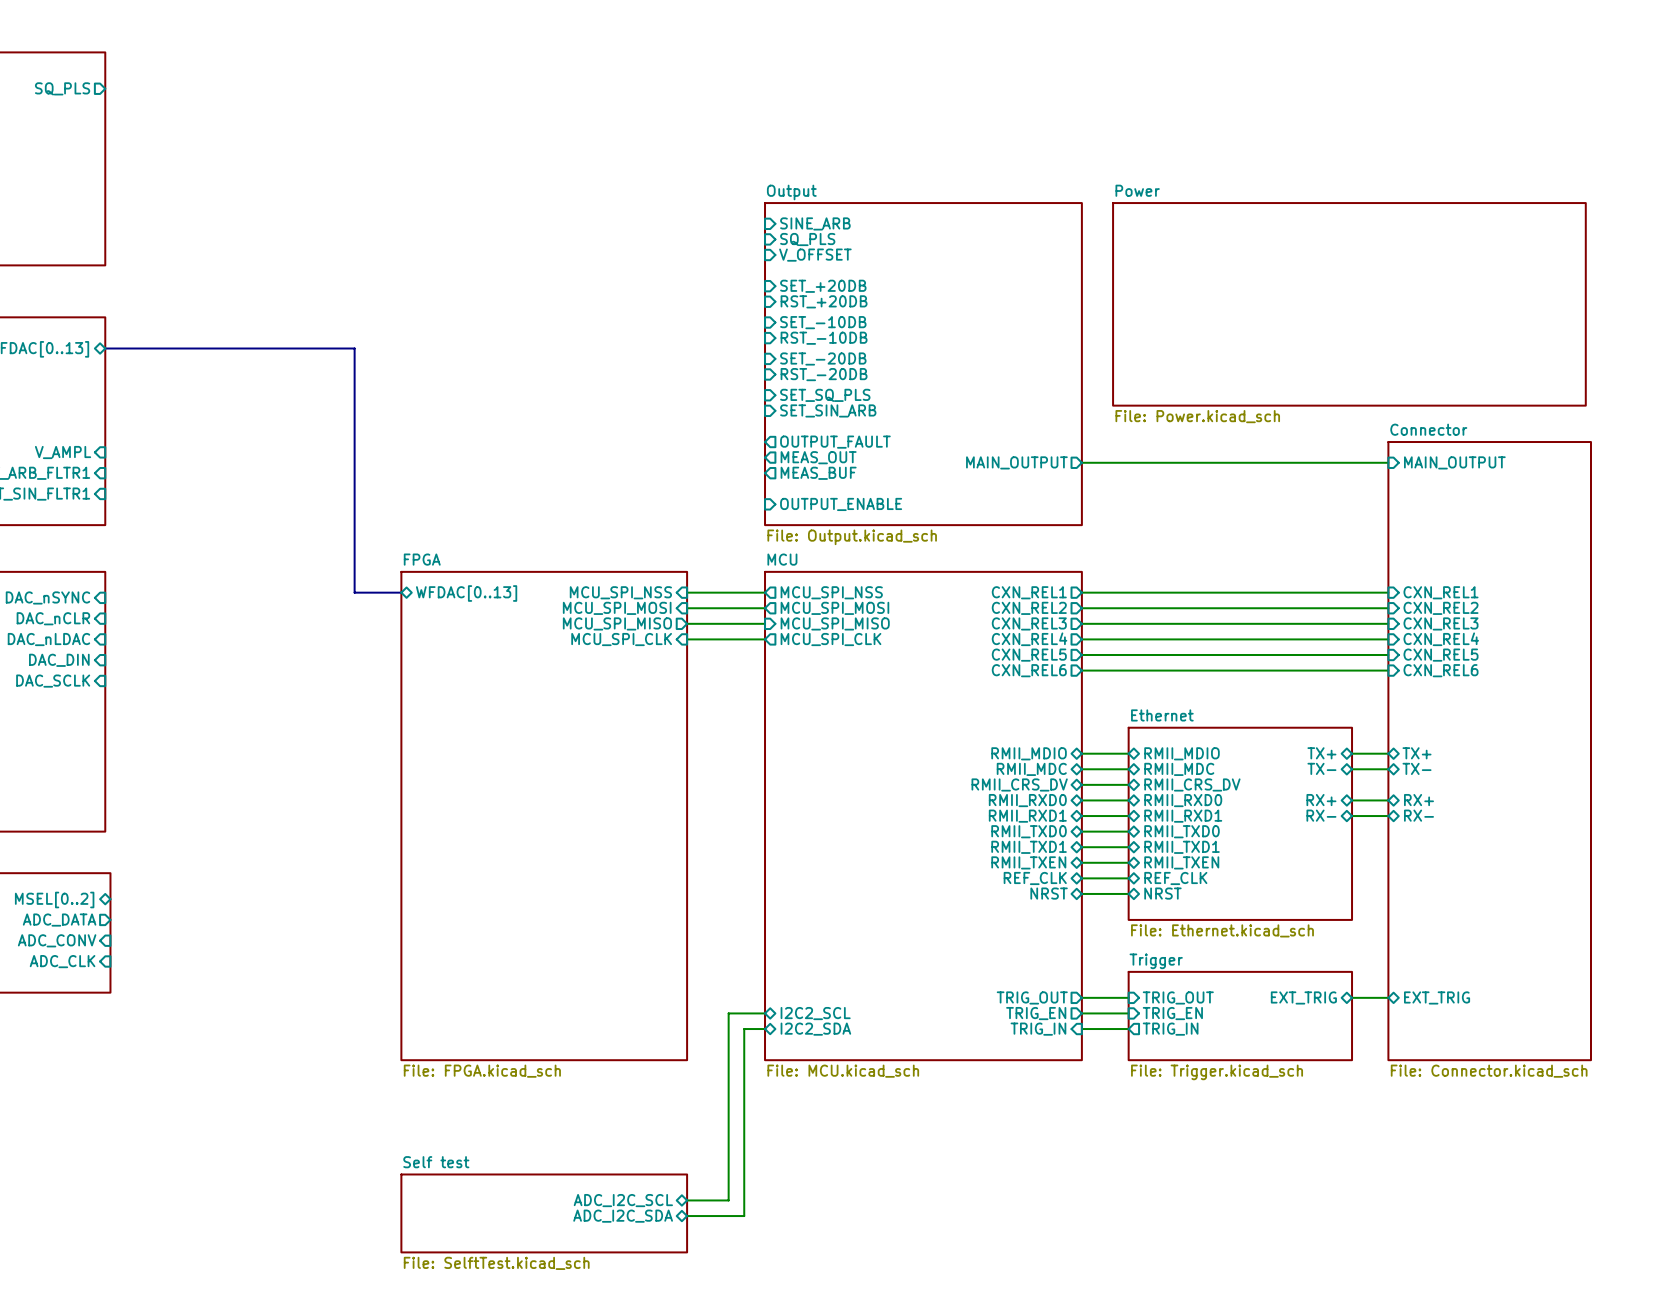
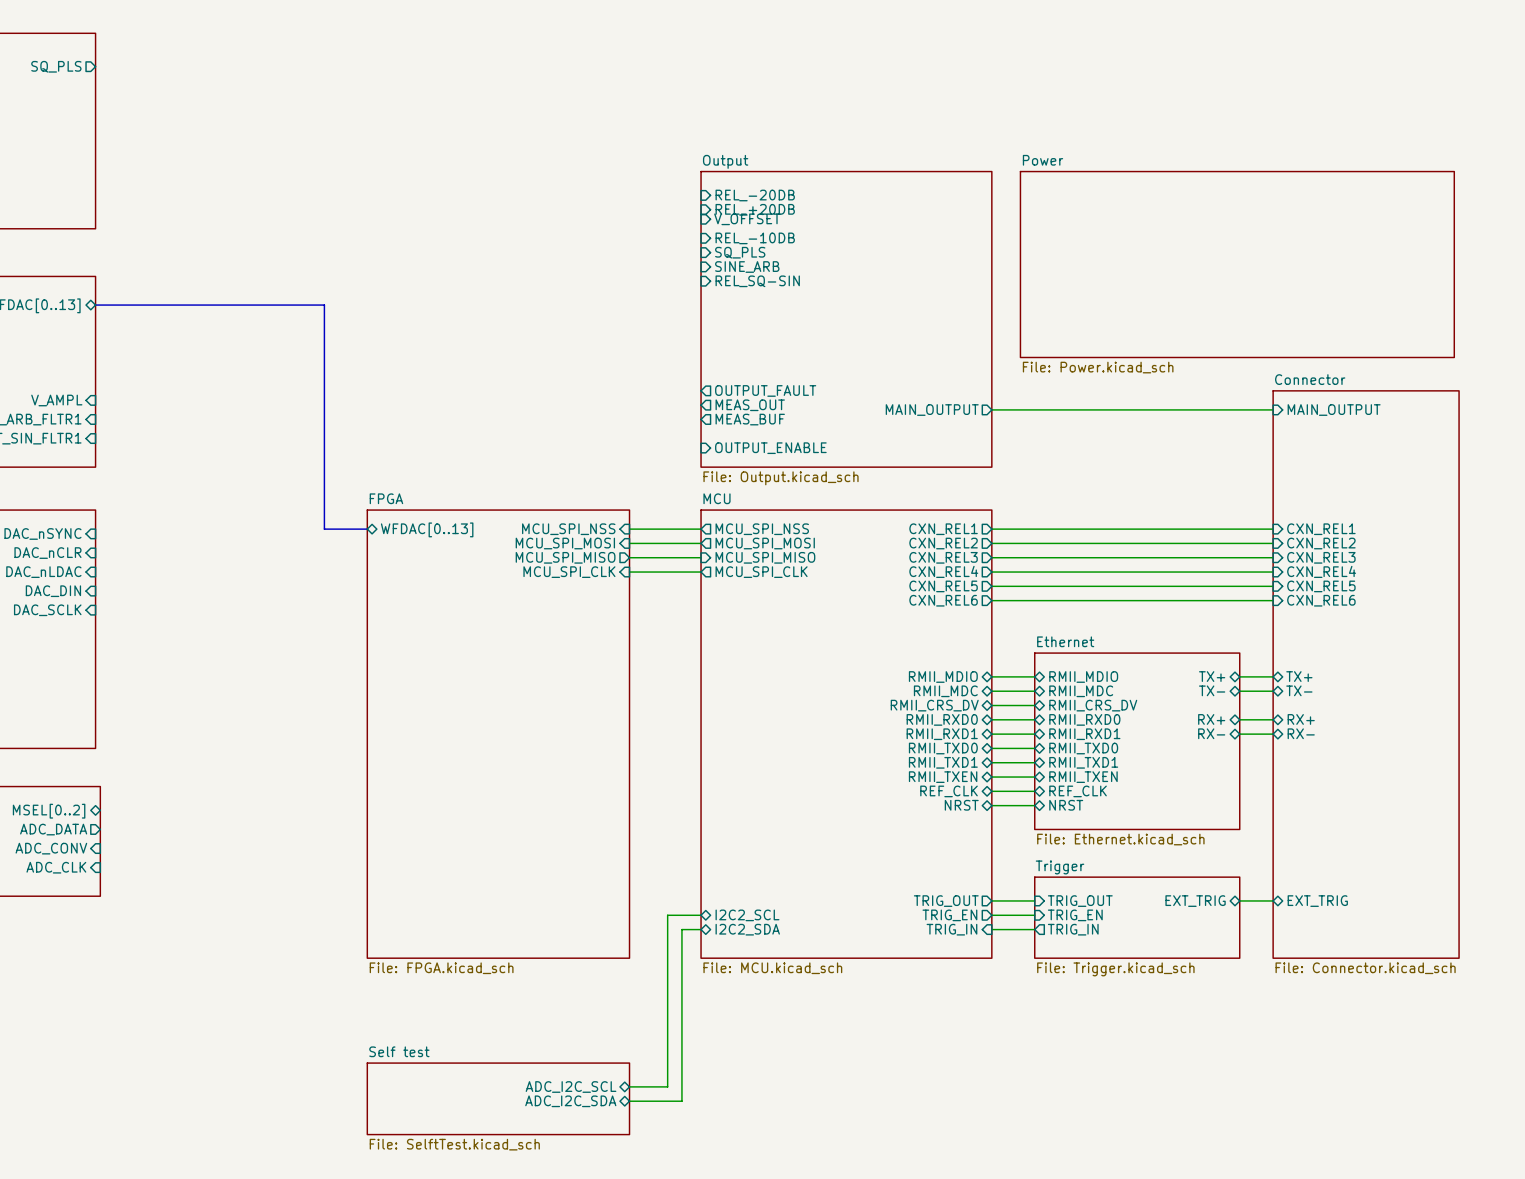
sheet pin position: SINE_ARB (815, 223) -> SINE_ARB (747, 267)
sheet pin: none -> REL_-20DB (755, 195)
sheet pin position: SQ_PLS (807, 239) -> SQ_PLS (740, 252)
sheet pin: none -> REL_+20DB (755, 209)
sheet pin: none -> REL_-10DB (755, 238)
sheet pin: SET_+20DB (823, 286) -> none
sheet pin: RST_+20DB (824, 301) -> none
sheet pin: SET_-10DB (823, 322) -> REL_SQ-SIN (757, 281)
sheet pin: RST_-10DB (824, 338) -> none
sheet pin: SET_-20DB (823, 358) -> none
sheet pin: RST_-20DB (824, 374) -> none
sheet pin: SET_SQ_PLS (825, 395) -> none
sheet pin: SET_SIN_ARB (828, 410) -> none

